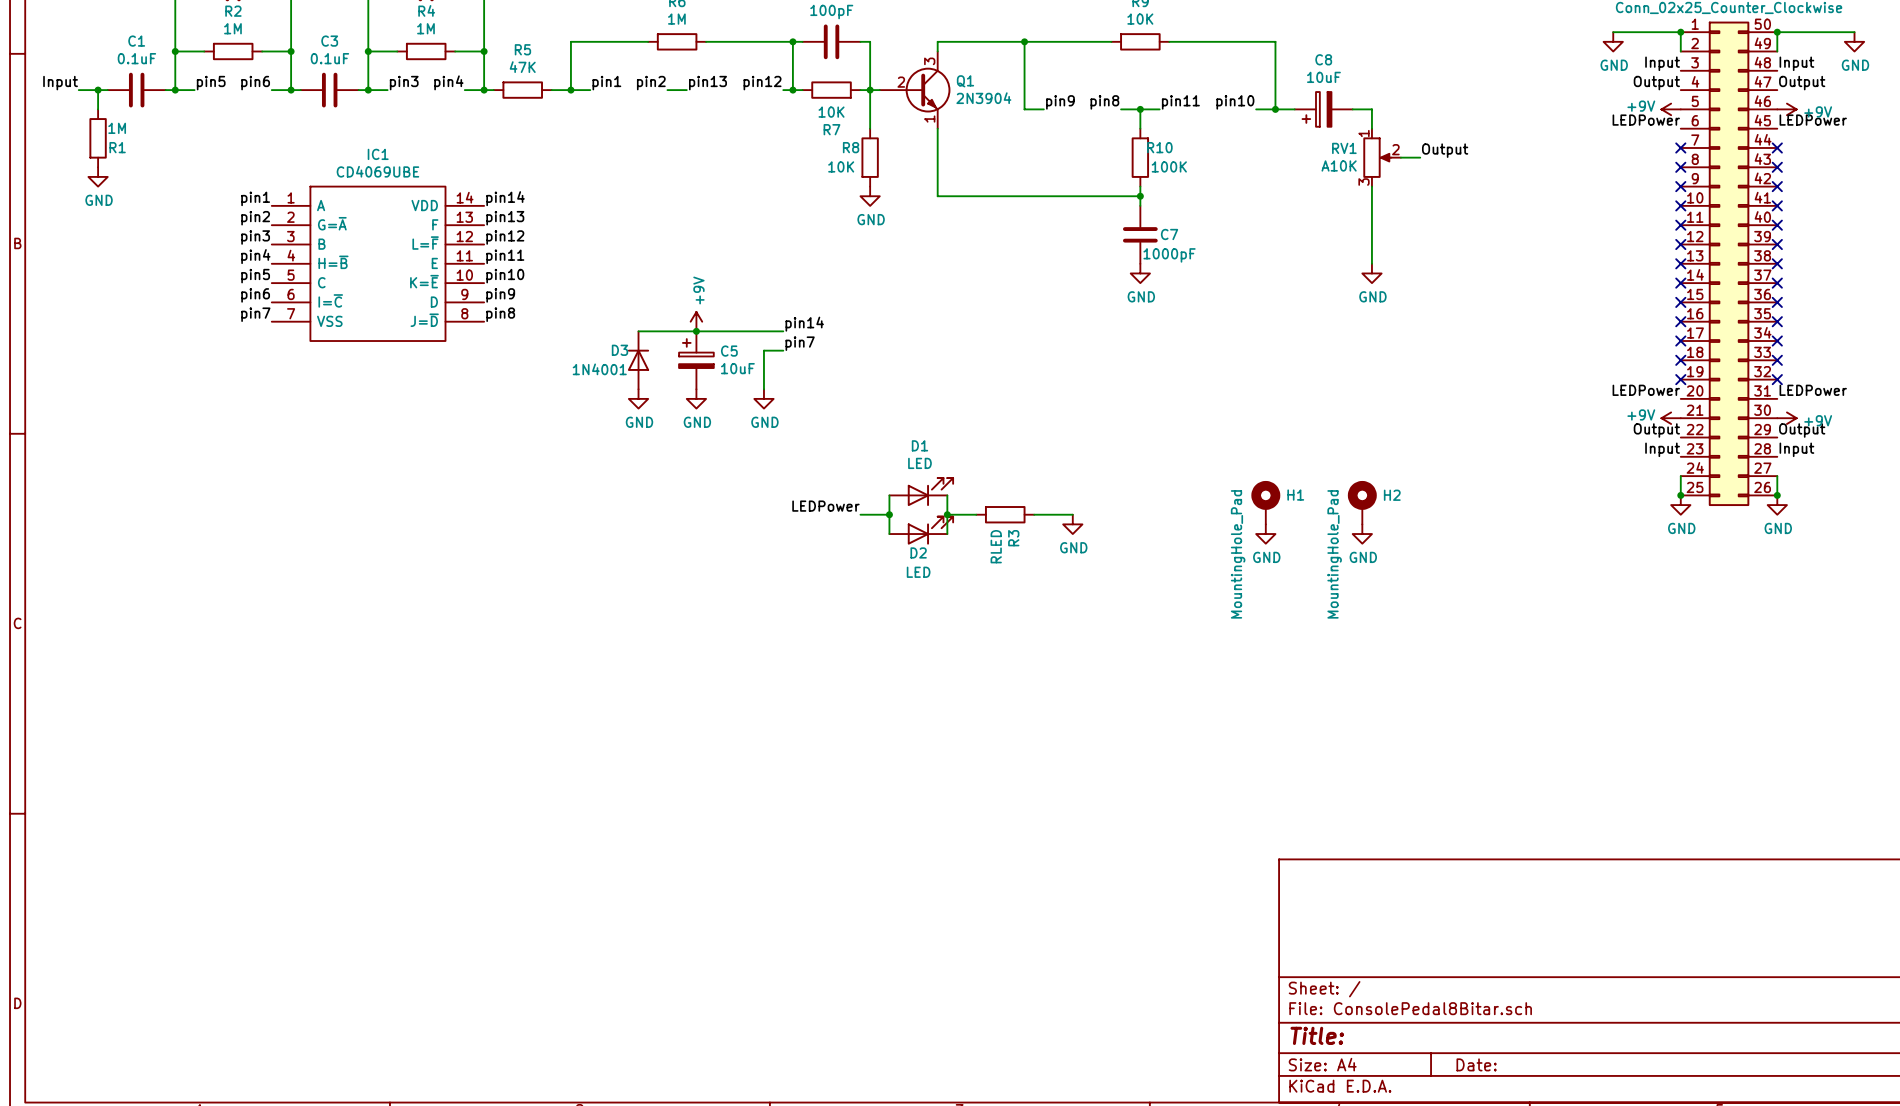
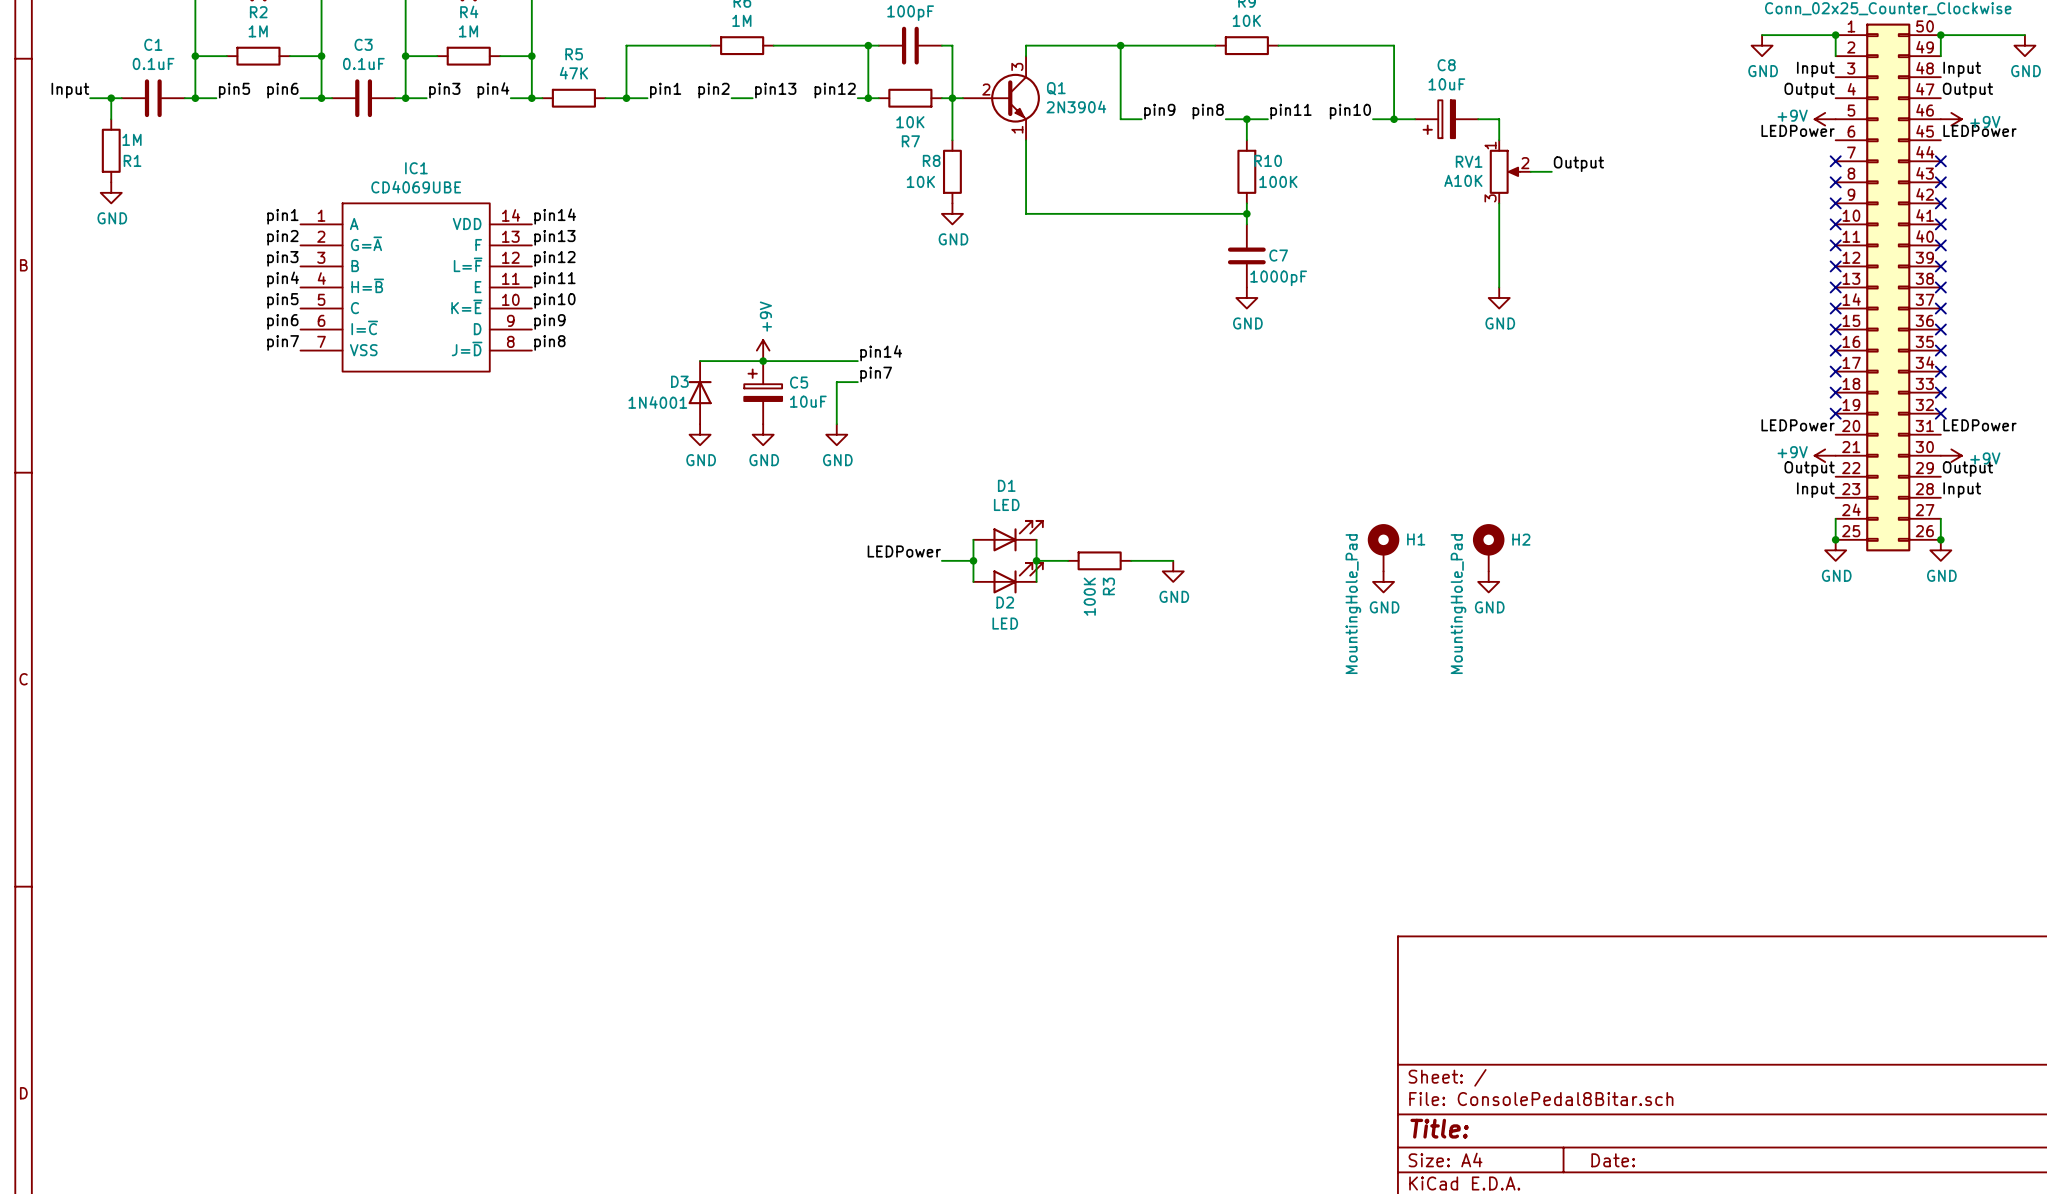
R3 value: RLED (996, 546) -> 100K (1089, 596)

